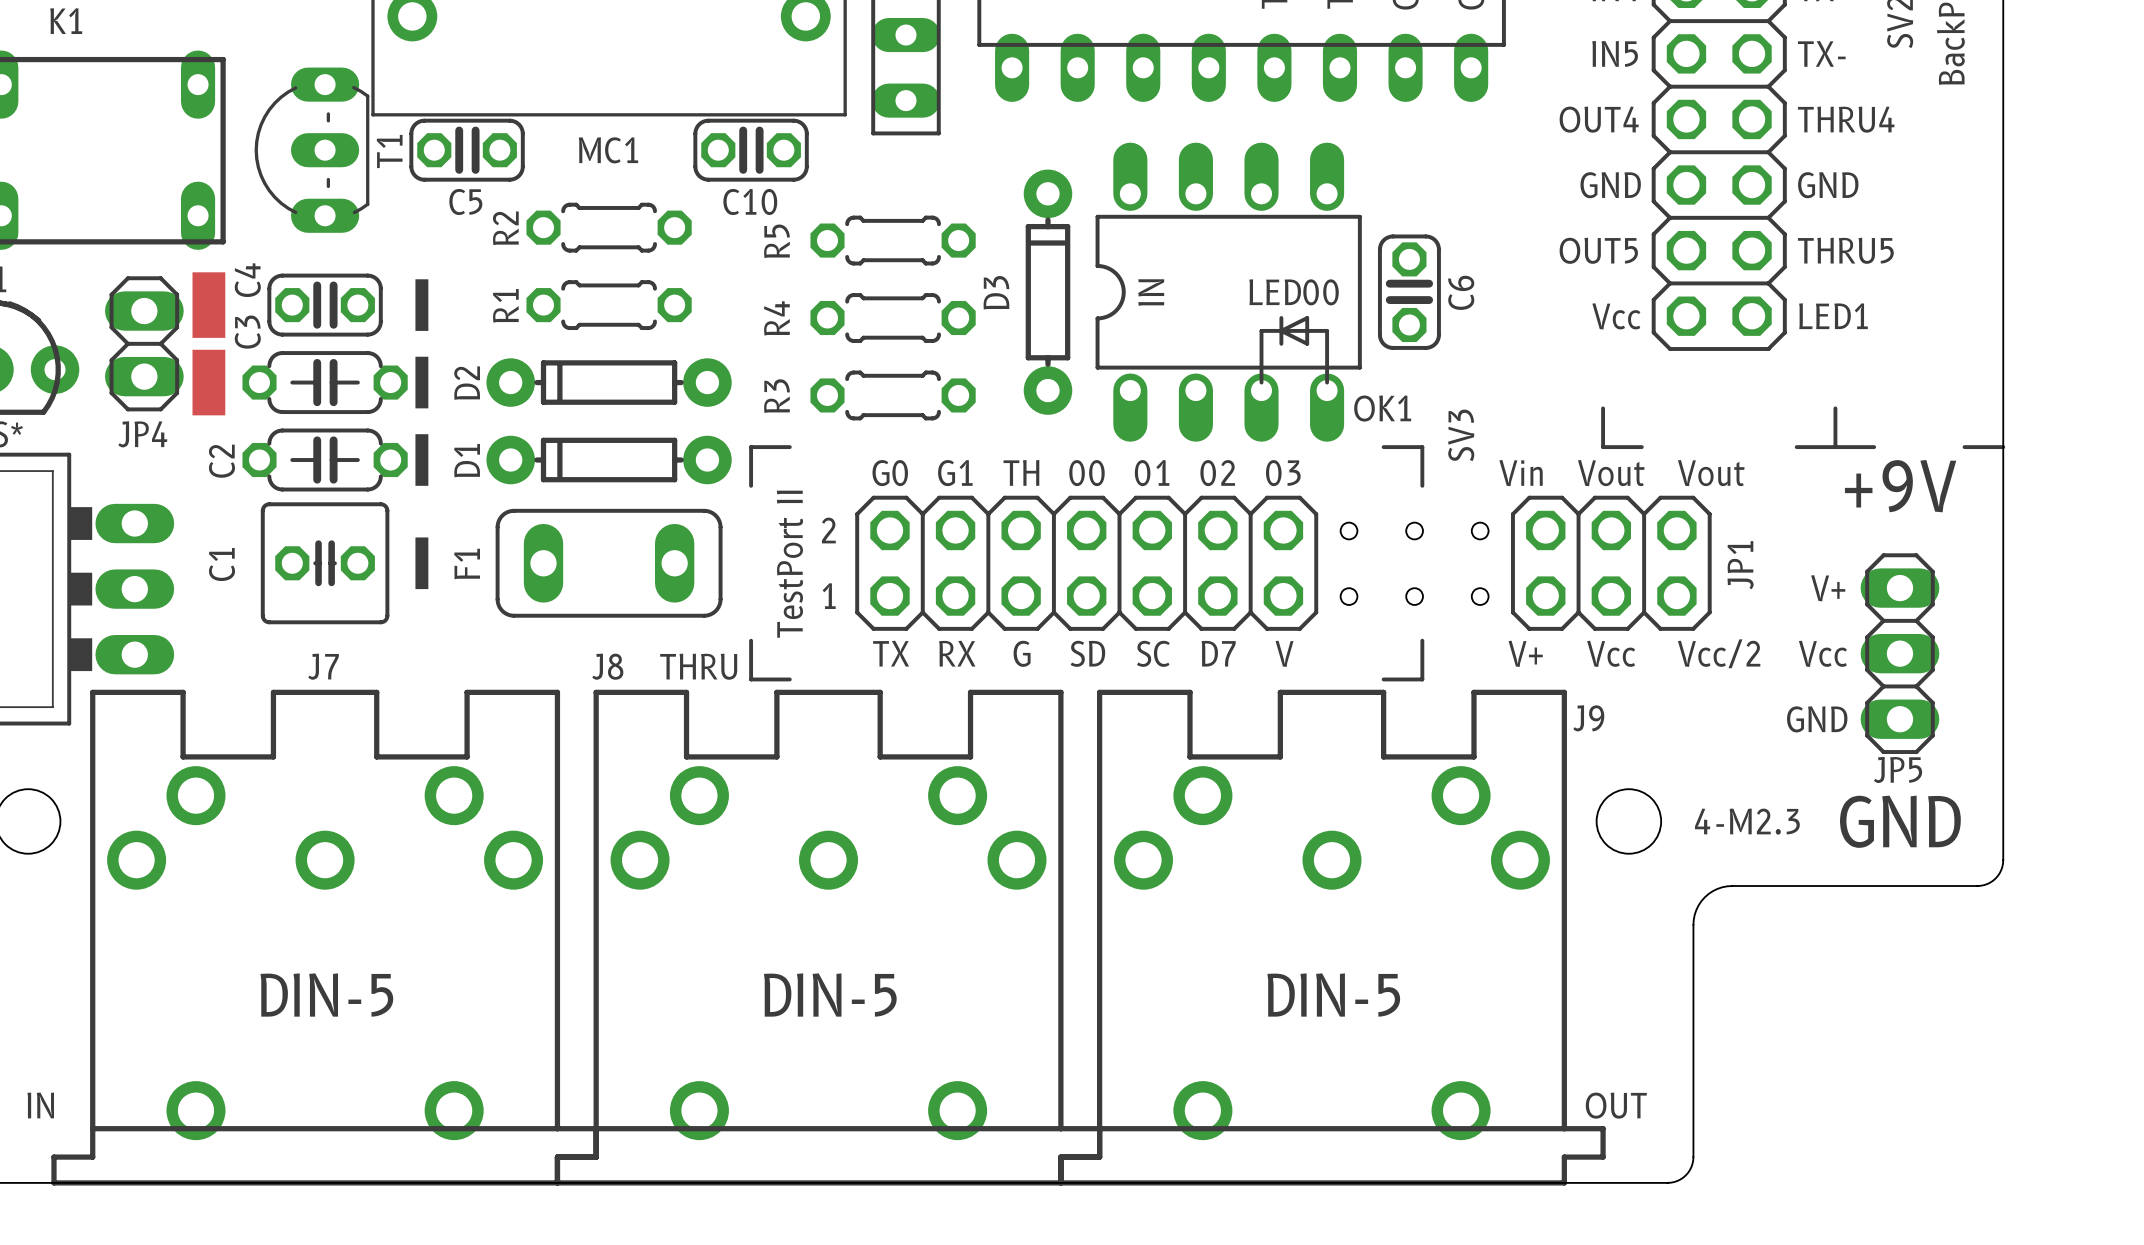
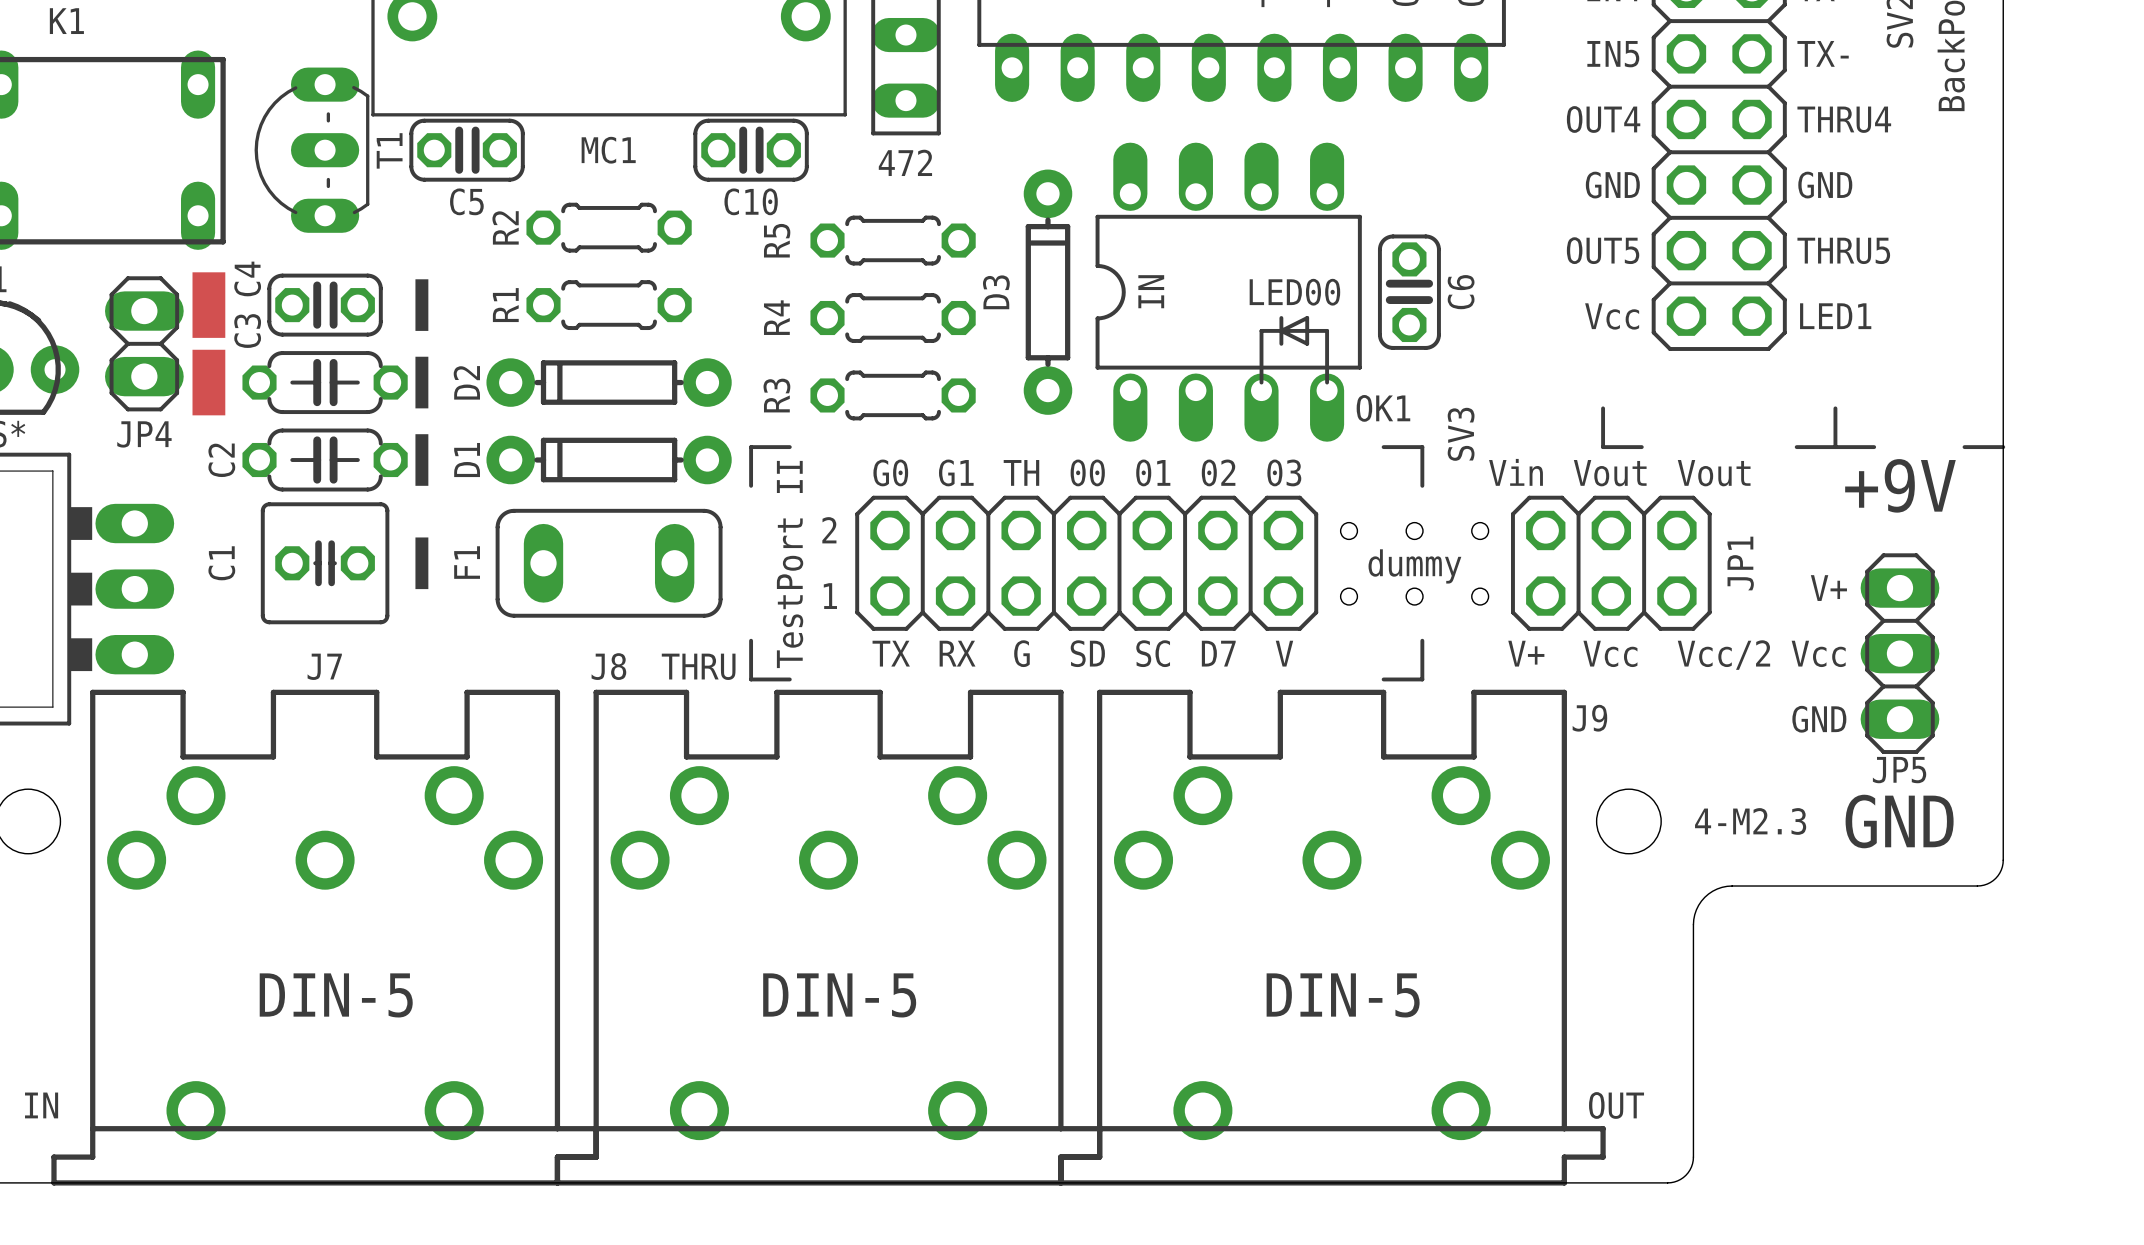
text: none -> 472 (905, 162)
text: none -> dummy (1414, 566)

